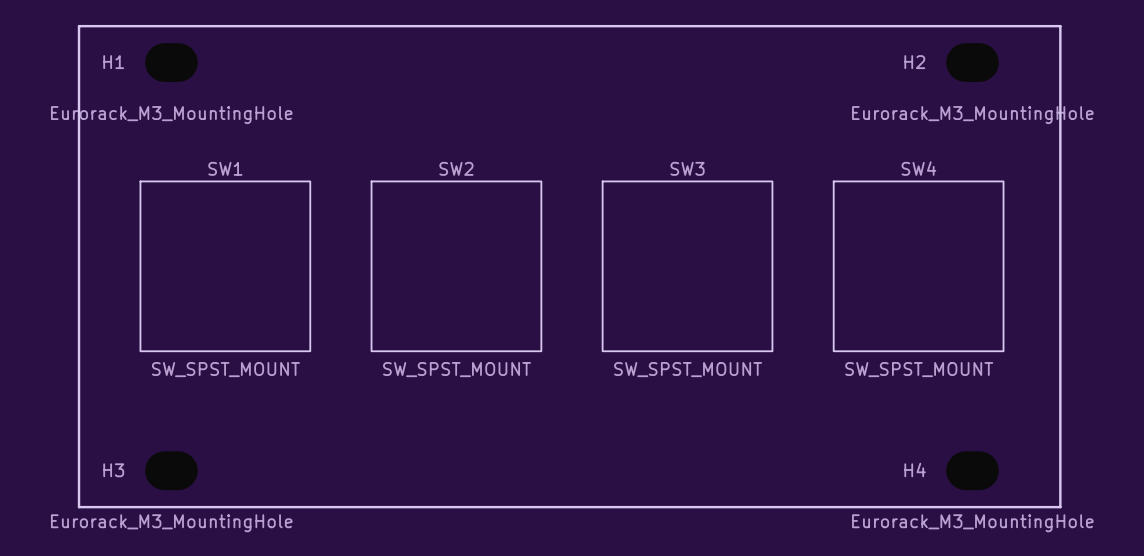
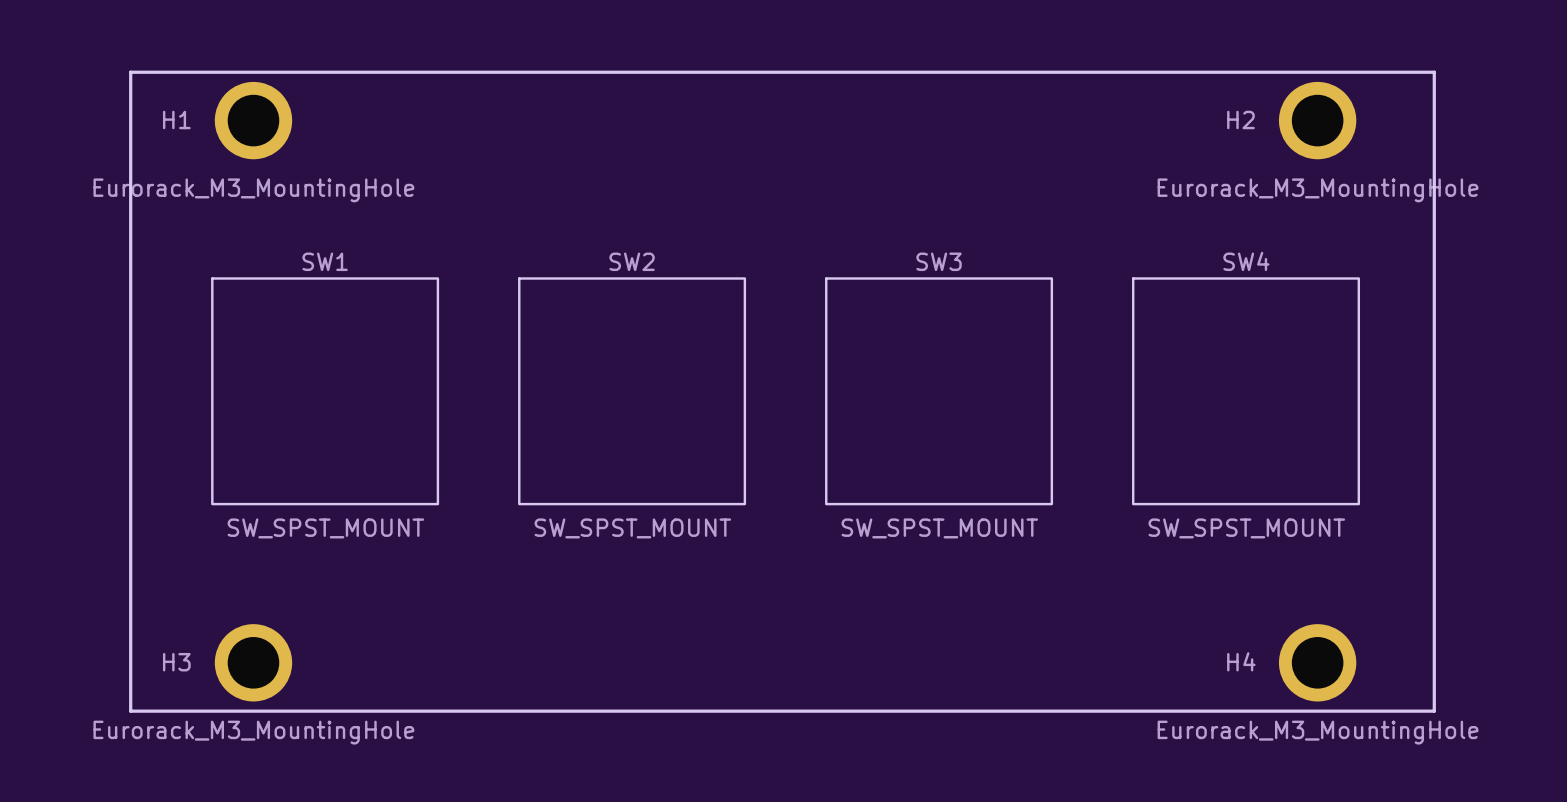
H1 footprint: [145, 43, 198, 82] -> [214, 81, 293, 160]
H2 footprint: [946, 43, 999, 82] -> [1278, 81, 1357, 160]
H3 footprint: [145, 451, 198, 491] -> [214, 624, 293, 702]
H4 footprint: [946, 451, 999, 491] -> [1278, 624, 1357, 702]

